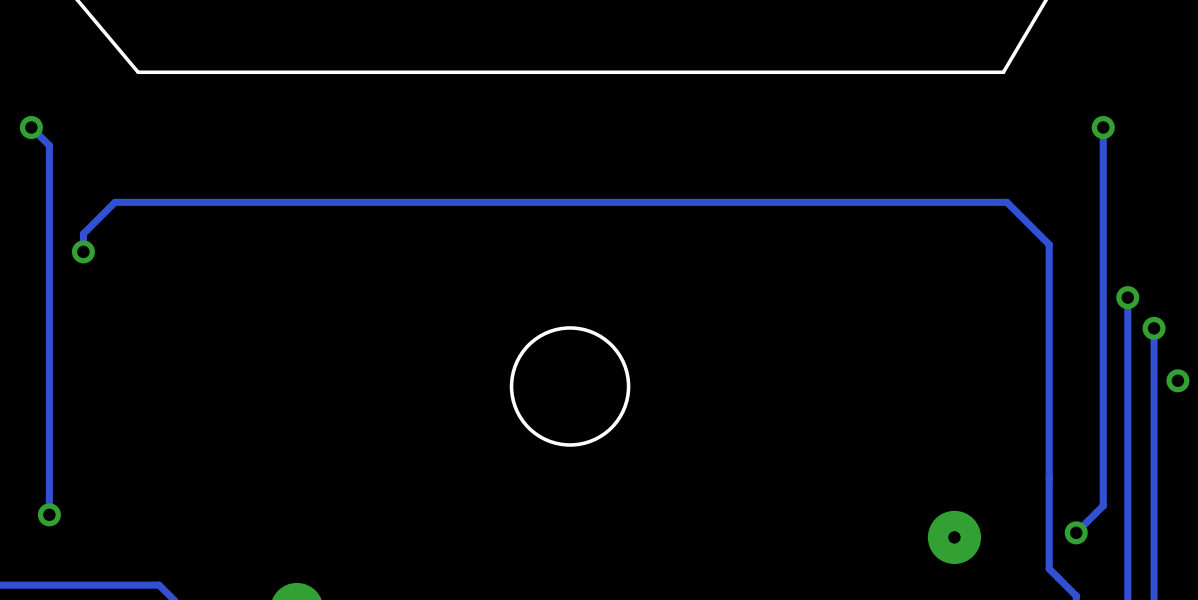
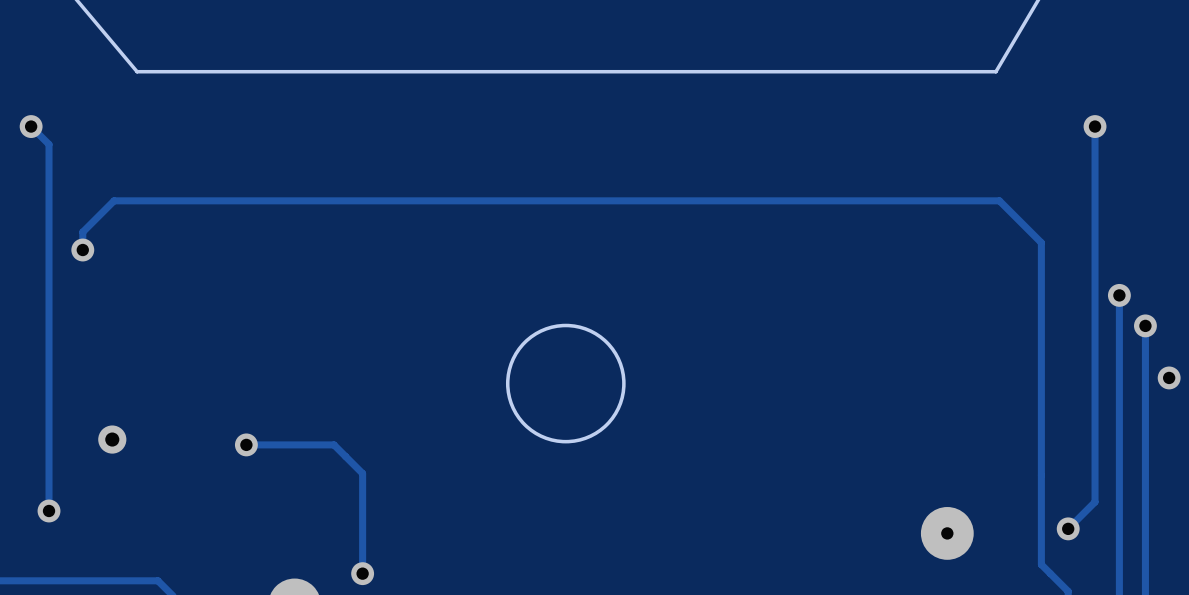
via: none -> (112, 439)
track: none -> (246, 444) (334, 444) (362, 473) (362, 573)
via: none -> (246, 444)
via: none -> (362, 573)

